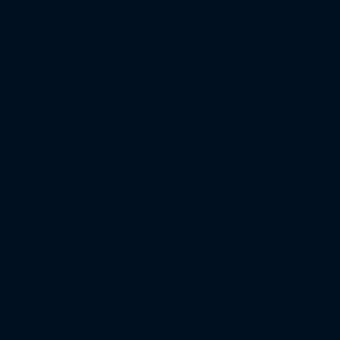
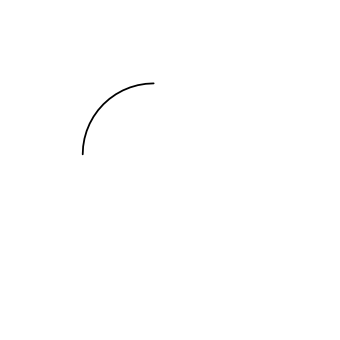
board edge: none -> (153, 83) (137, 85) (122, 90) (103, 104) (93, 116) (86, 130) (82, 154)

